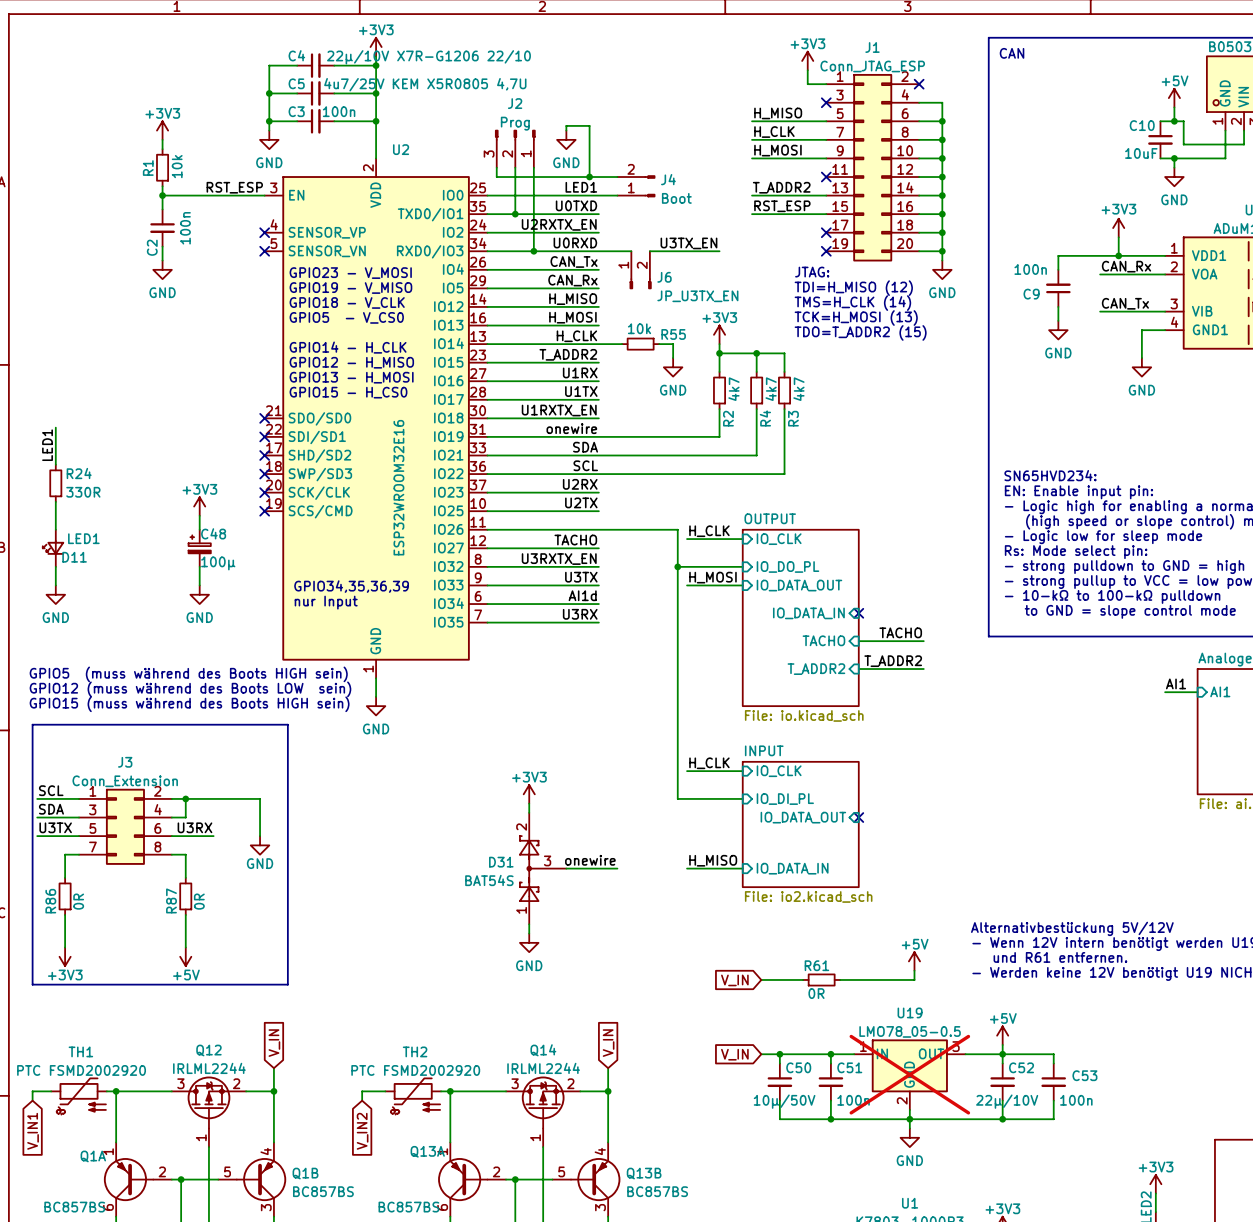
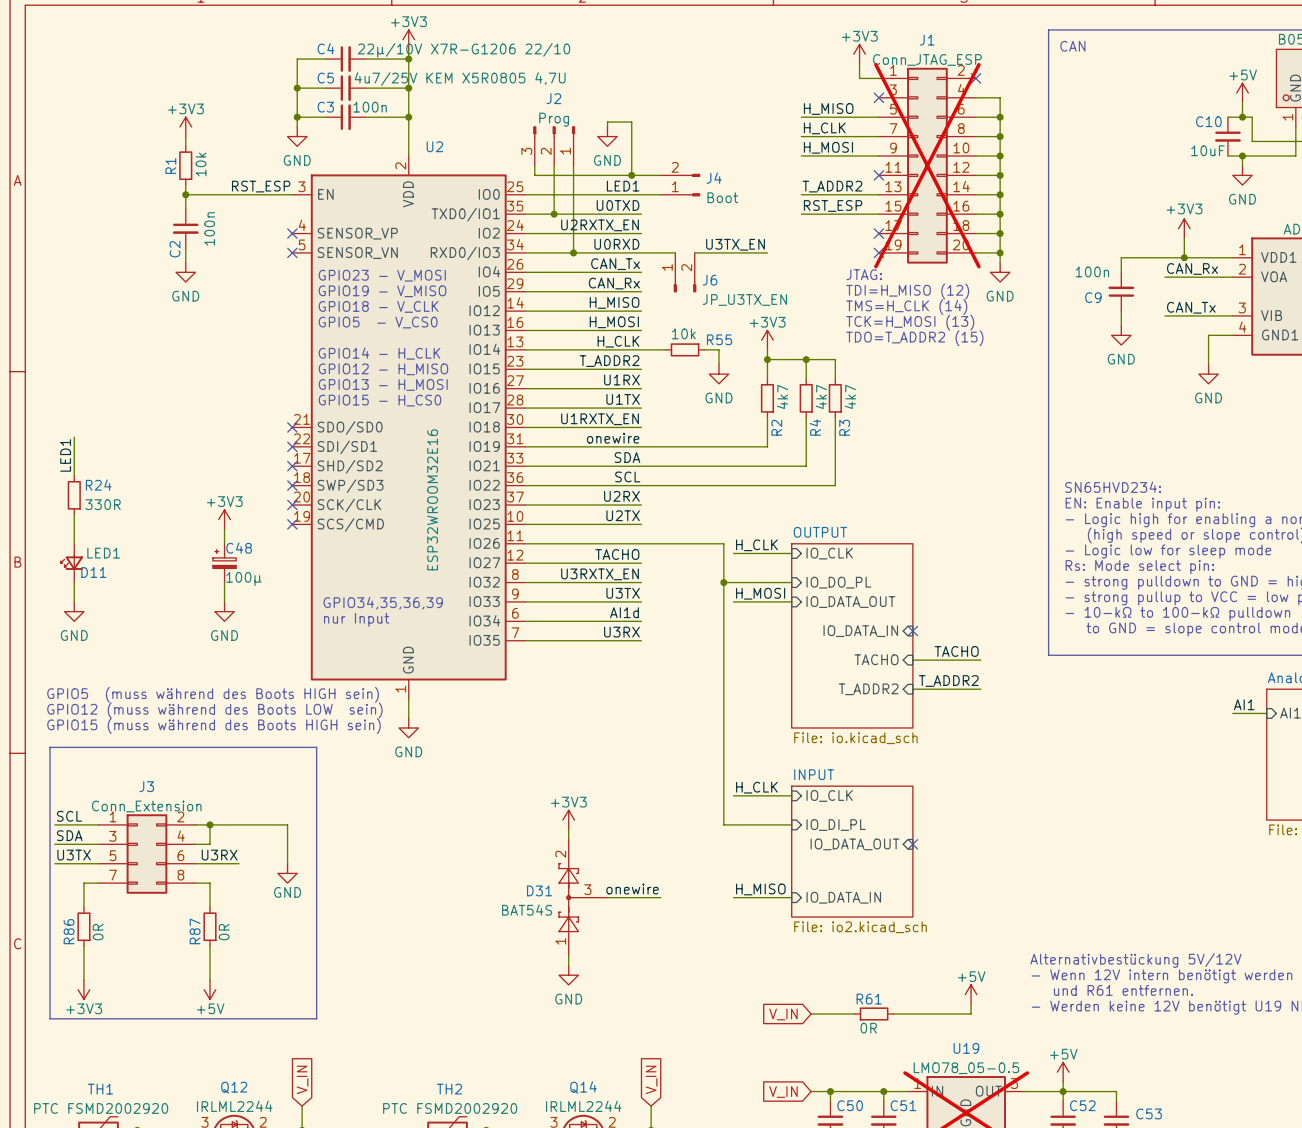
J1 do-not-place cross: none -> (927, 165)

